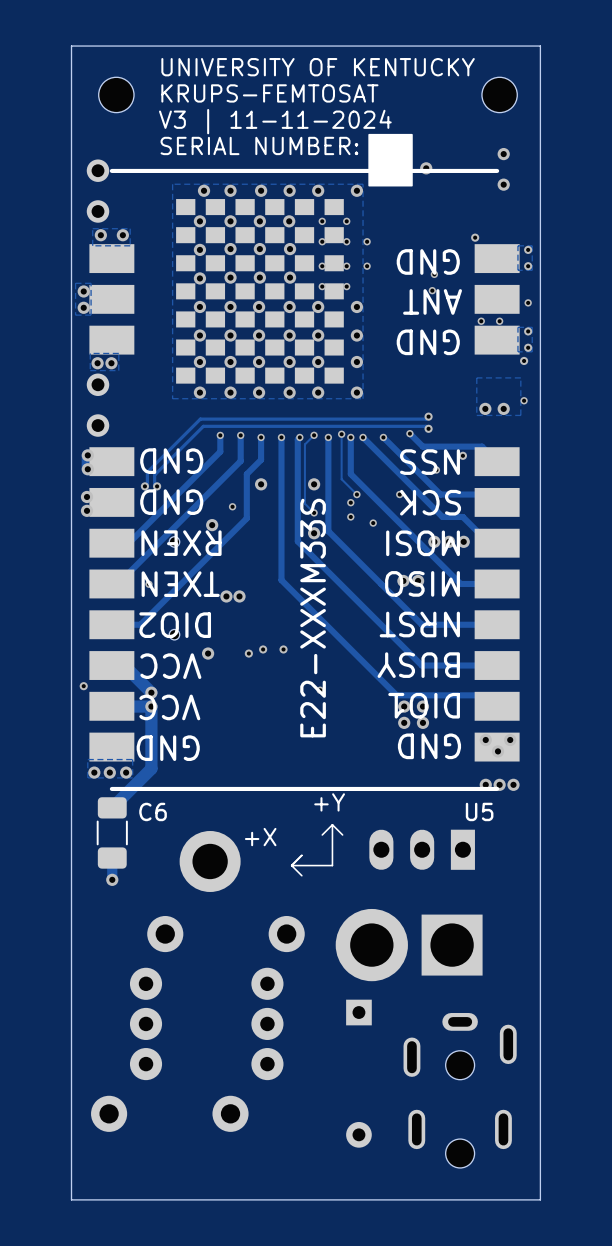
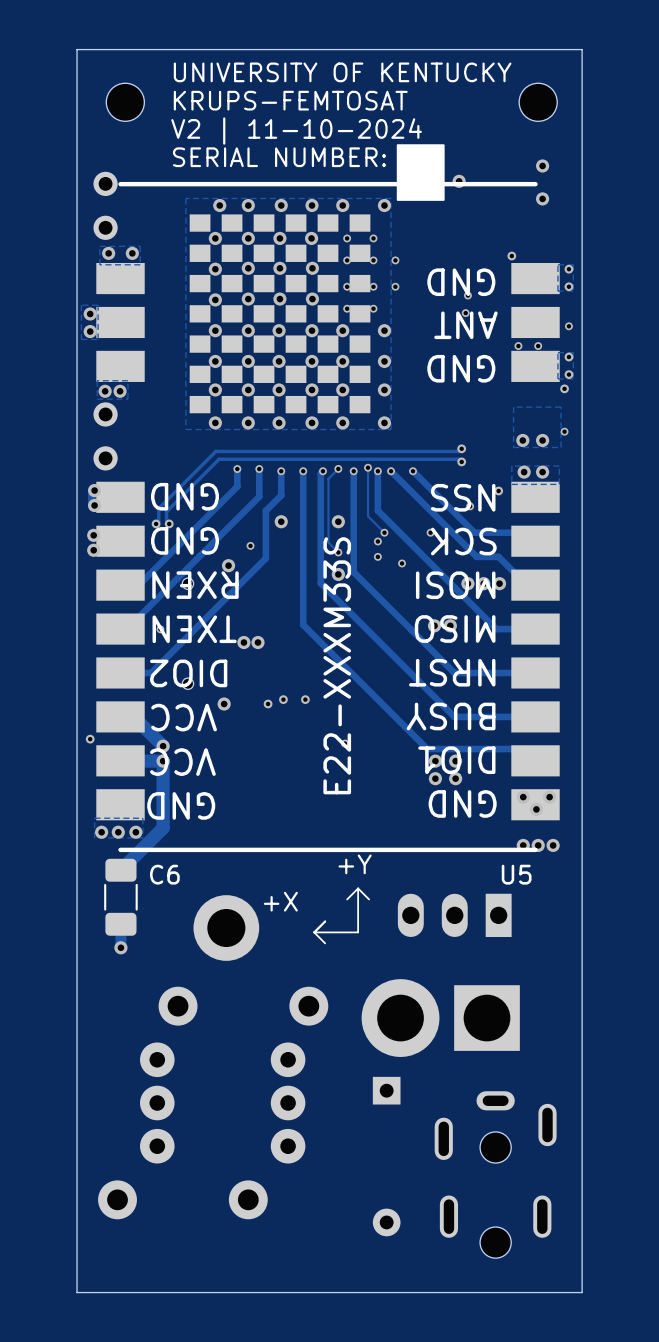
text: V3 | 11-11-2024 (275, 121) -> V2 | 11-10-2024 (296, 131)
zone outline: none -> (559, 465) (511, 465) (511, 484) (559, 484) (559, 465)
track: (409, 433) (422, 446) (482, 446) (497, 461) -> none
via: (409, 433) -> none
via: none -> (524, 472)
via: none -> (542, 472)

